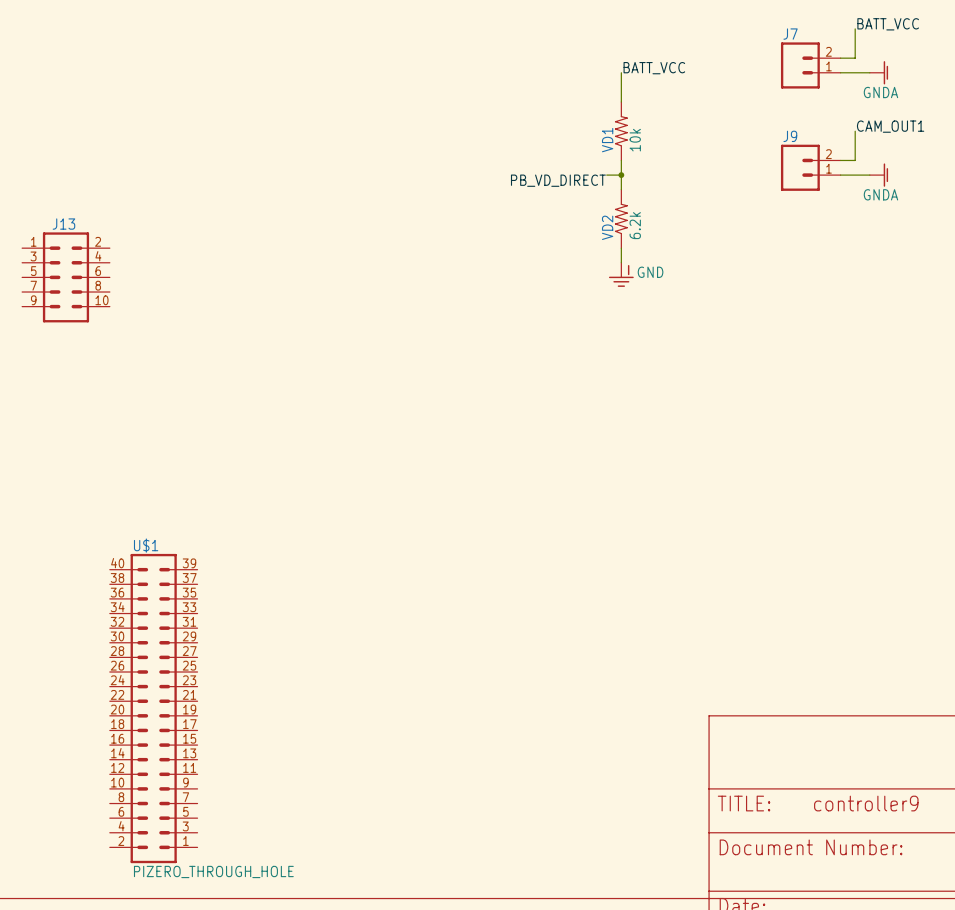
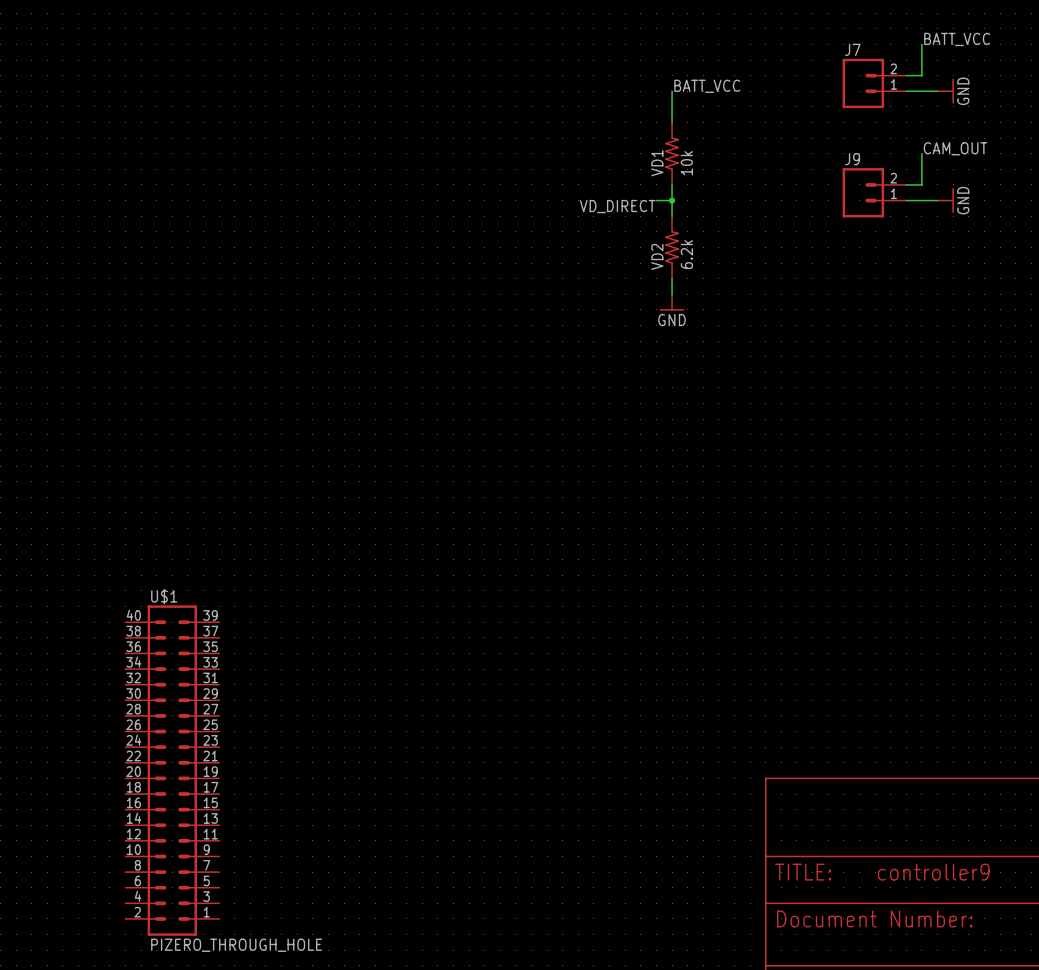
power symbol: GNDA (878, 72) -> GND (945, 91)
label: CAM_OUT1 (890, 126) -> CAM_OUT (955, 148)
power symbol: GNDA (878, 175) -> GND (945, 200)
label: PB_VD_DIRECT (558, 180) -> VD_DIRECT (617, 206)
power symbol shape: [608, 262, 634, 287] -> [659, 294, 685, 311]
power symbol text position: GND (650, 272) -> GND (671, 320)
J13: (65, 277) -> none

